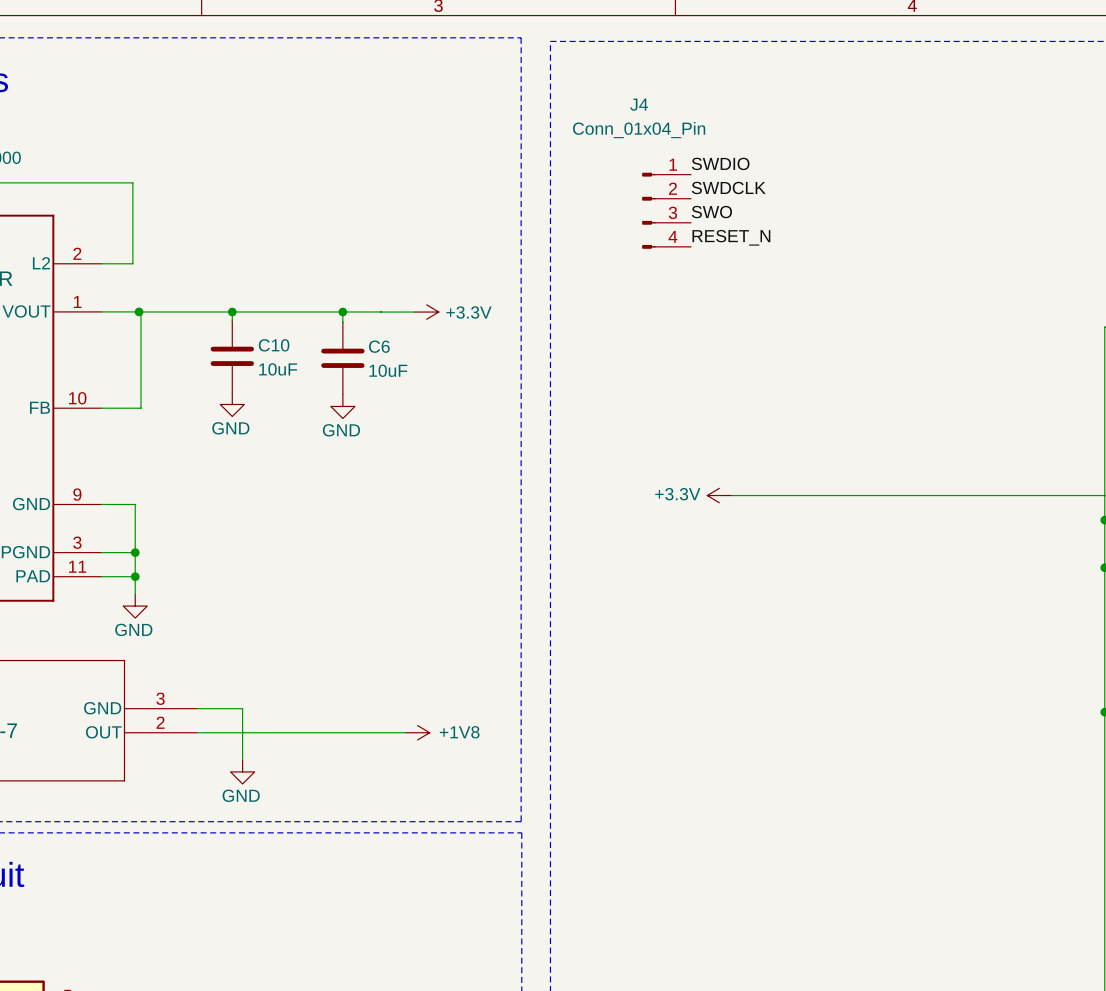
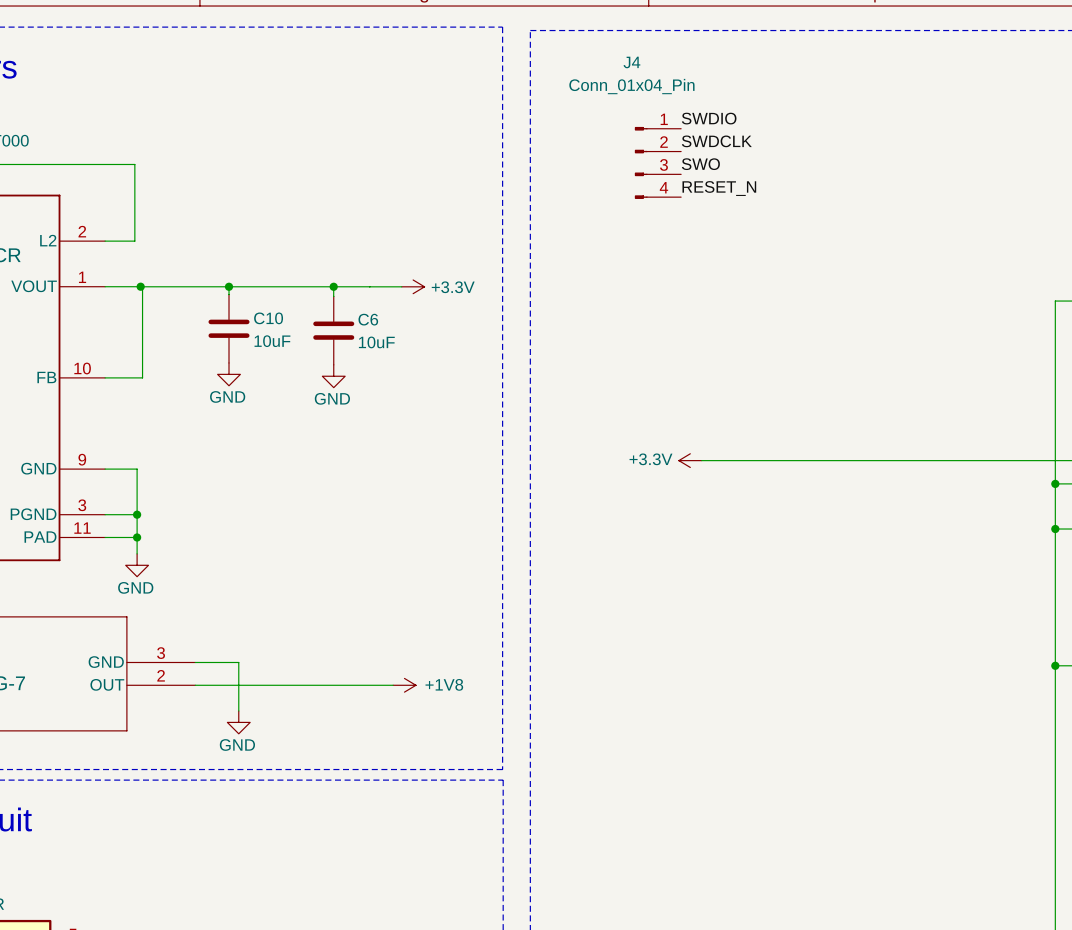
label position: SWDIO (720, 163) -> SWDIO (709, 118)
label position: SWDCLK (728, 187) -> SWDCLK (716, 141)
J4 position: (666, 210) -> (657, 162)
label position: SWO (711, 212) -> SWO (700, 164)
label position: RESET_N (731, 237) -> RESET_N (719, 188)

